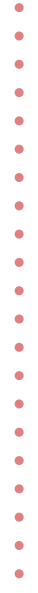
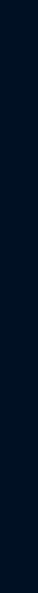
part: (19, 7) -> none
part: (19, 35) -> none
part: (19, 64) -> none
part: (19, 92) -> none
part: (19, 120) -> none
part: (19, 149) -> none
part: (19, 177) -> none
part: (19, 205) -> none
part: (19, 234) -> none
part: (19, 262) -> none
part: (19, 290) -> none
part: (19, 319) -> none
part: (19, 347) -> none
part: (19, 375) -> none
part: (19, 403) -> none
part: (19, 432) -> none
part: (19, 460) -> none
part: (19, 488) -> none
part: (19, 517) -> none
part: (19, 545) -> none
part: (19, 573) -> none

